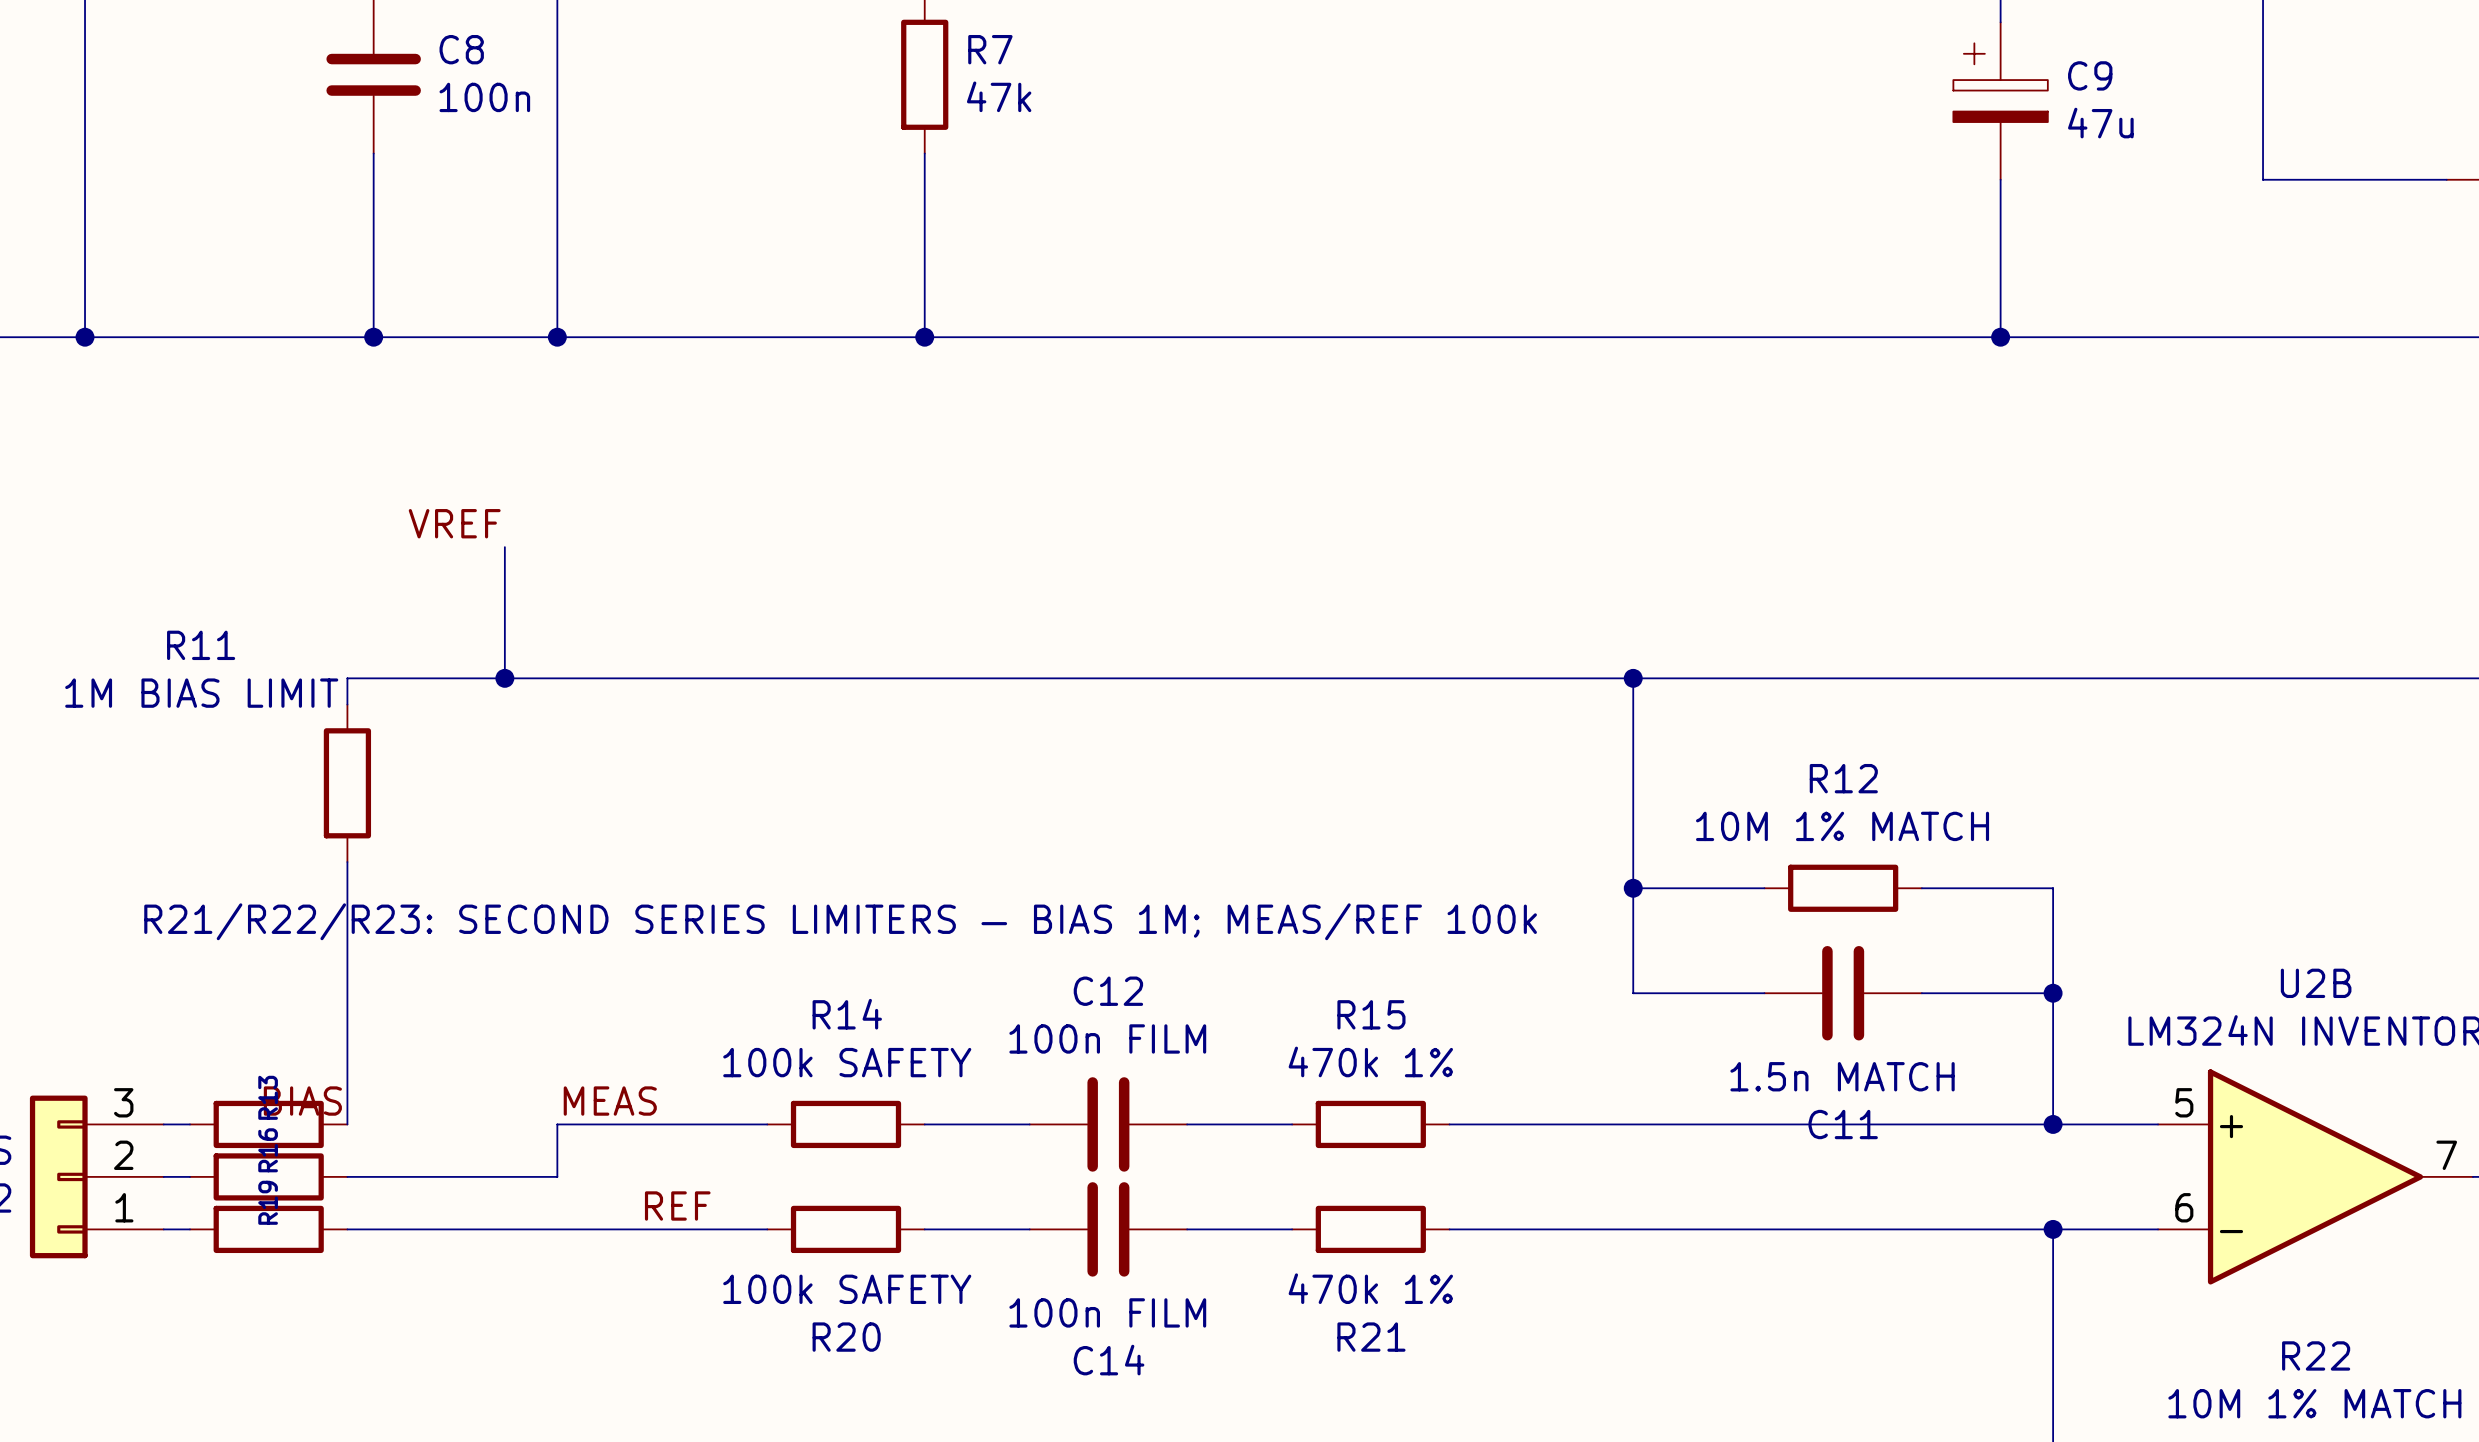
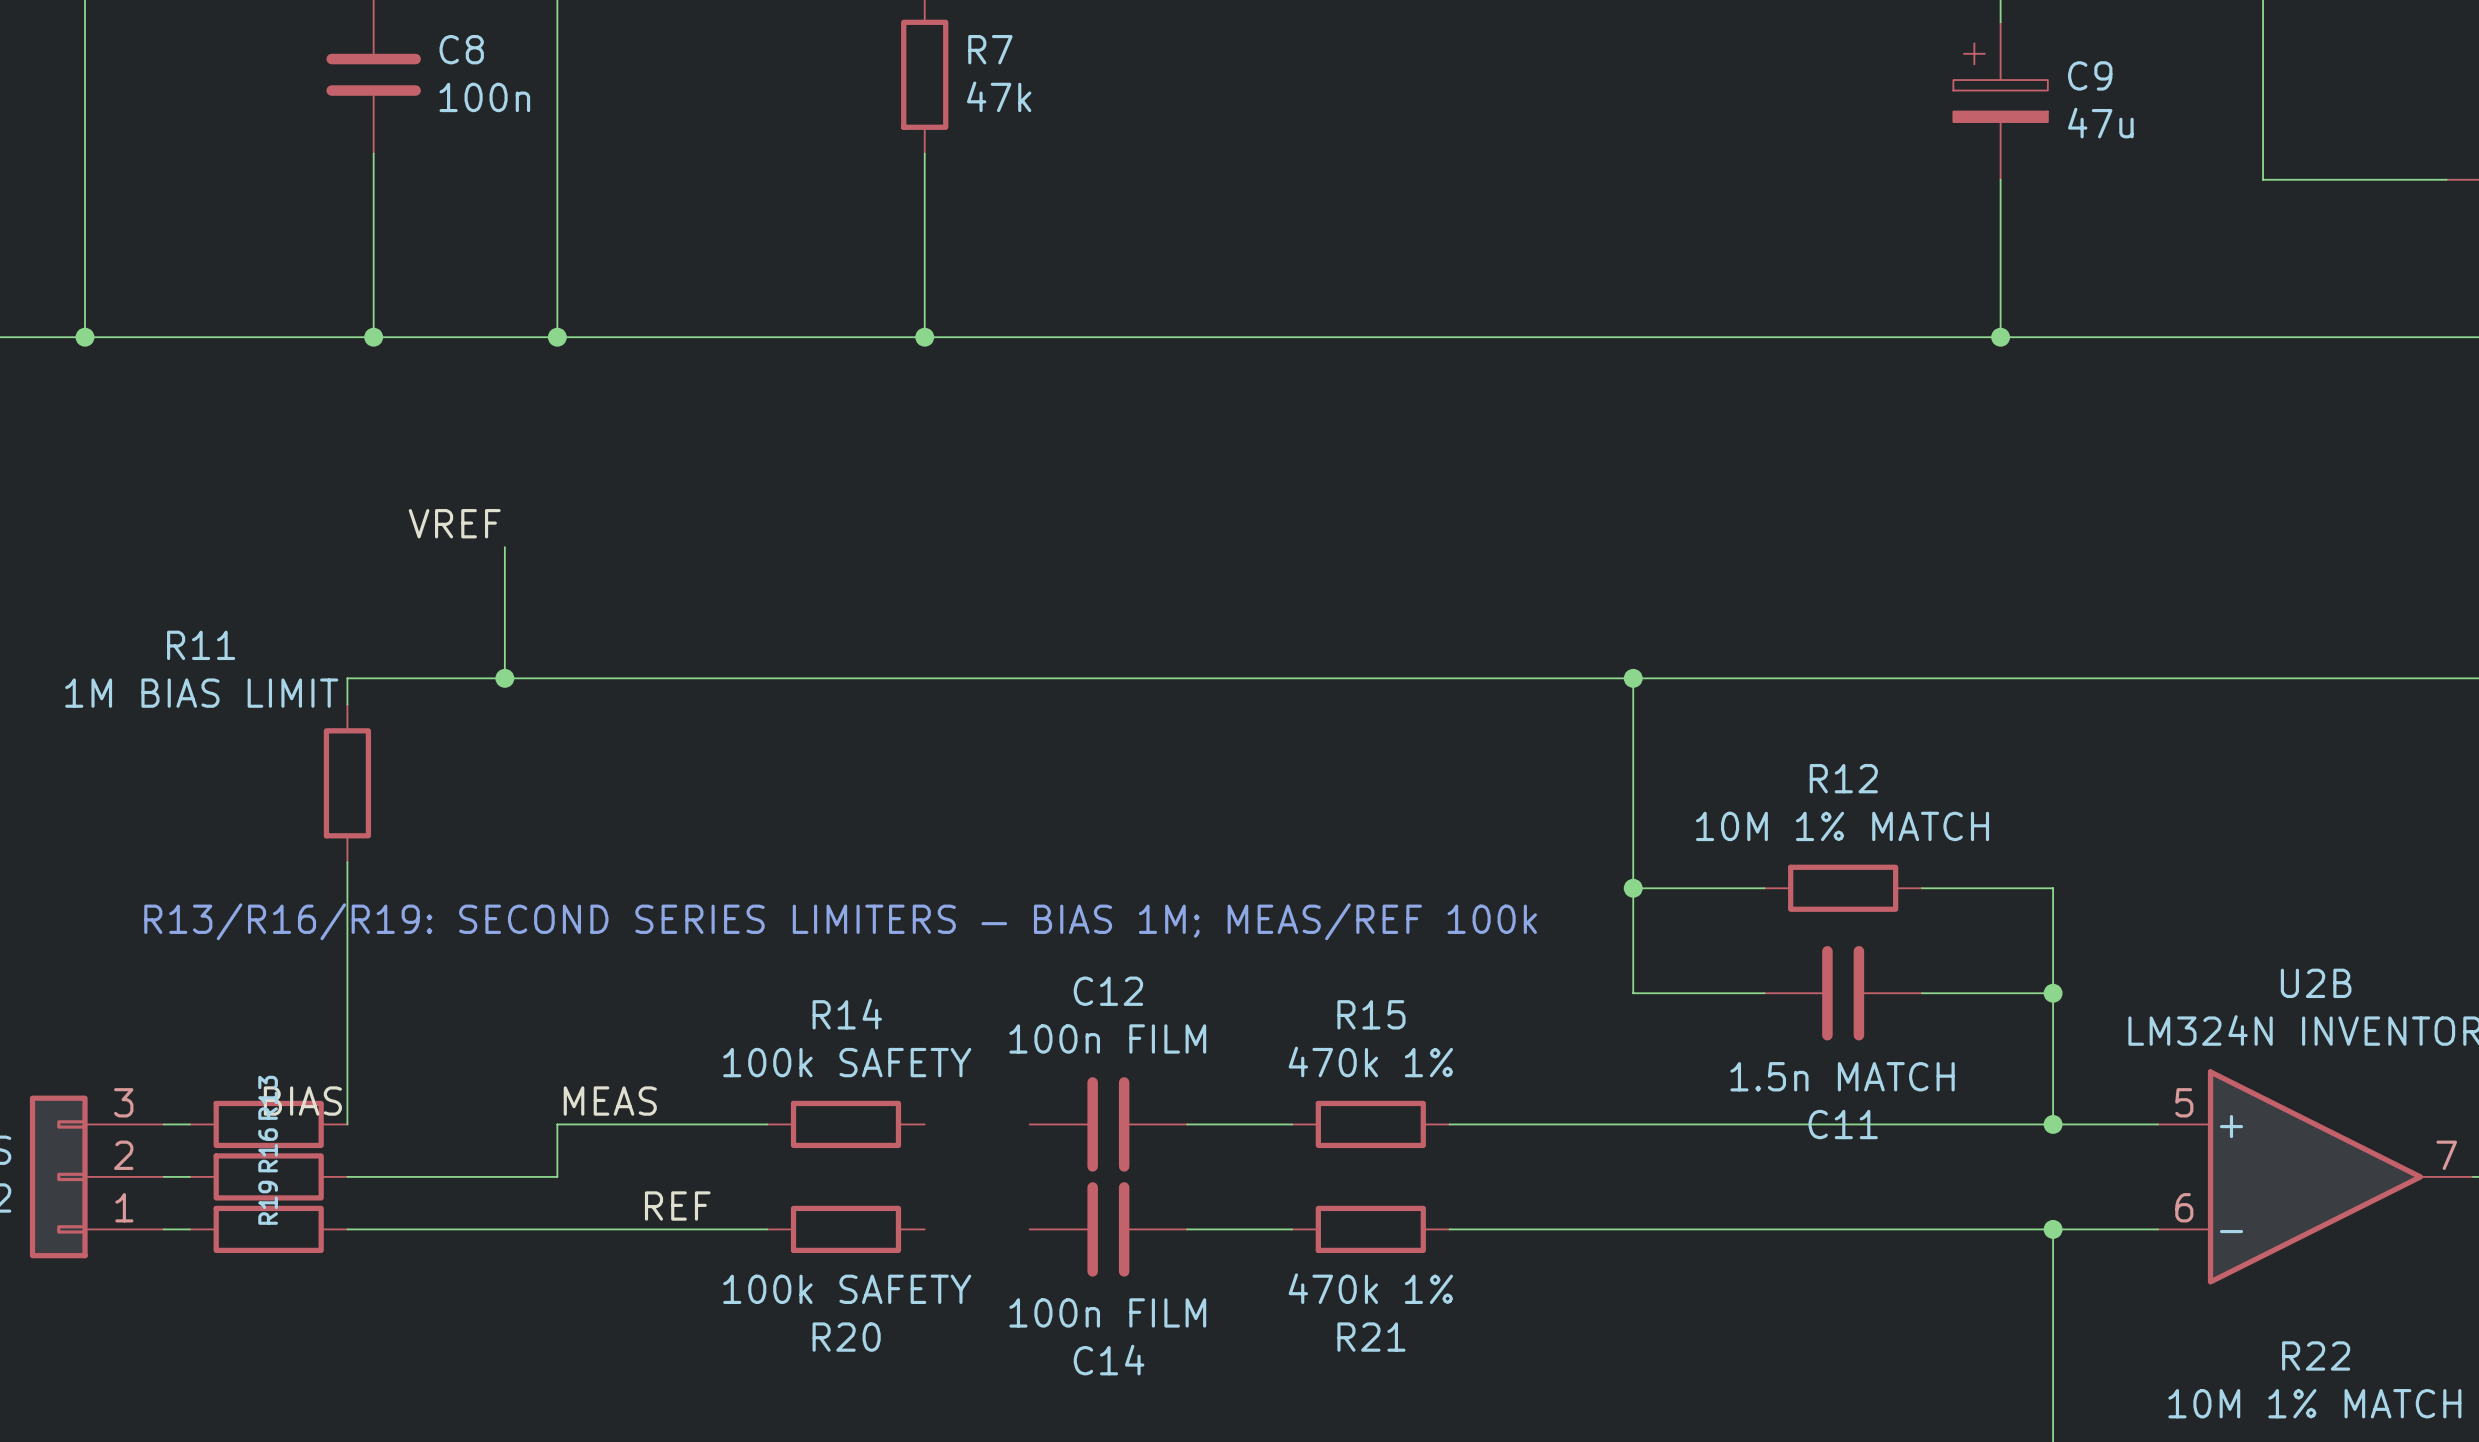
text: R21/R22/R23: SECOND SERIES LIMITERS — BIAS 1M; MEAS/REF 100k (840, 921) -> R13/R16/R19: SECOND SERIES LIMITERS — BIAS 1M; MEAS/REF 100k (840, 921)
wire: (924, 1124) (1029, 1124) -> none
wire: (924, 1229) (1029, 1229) -> none

